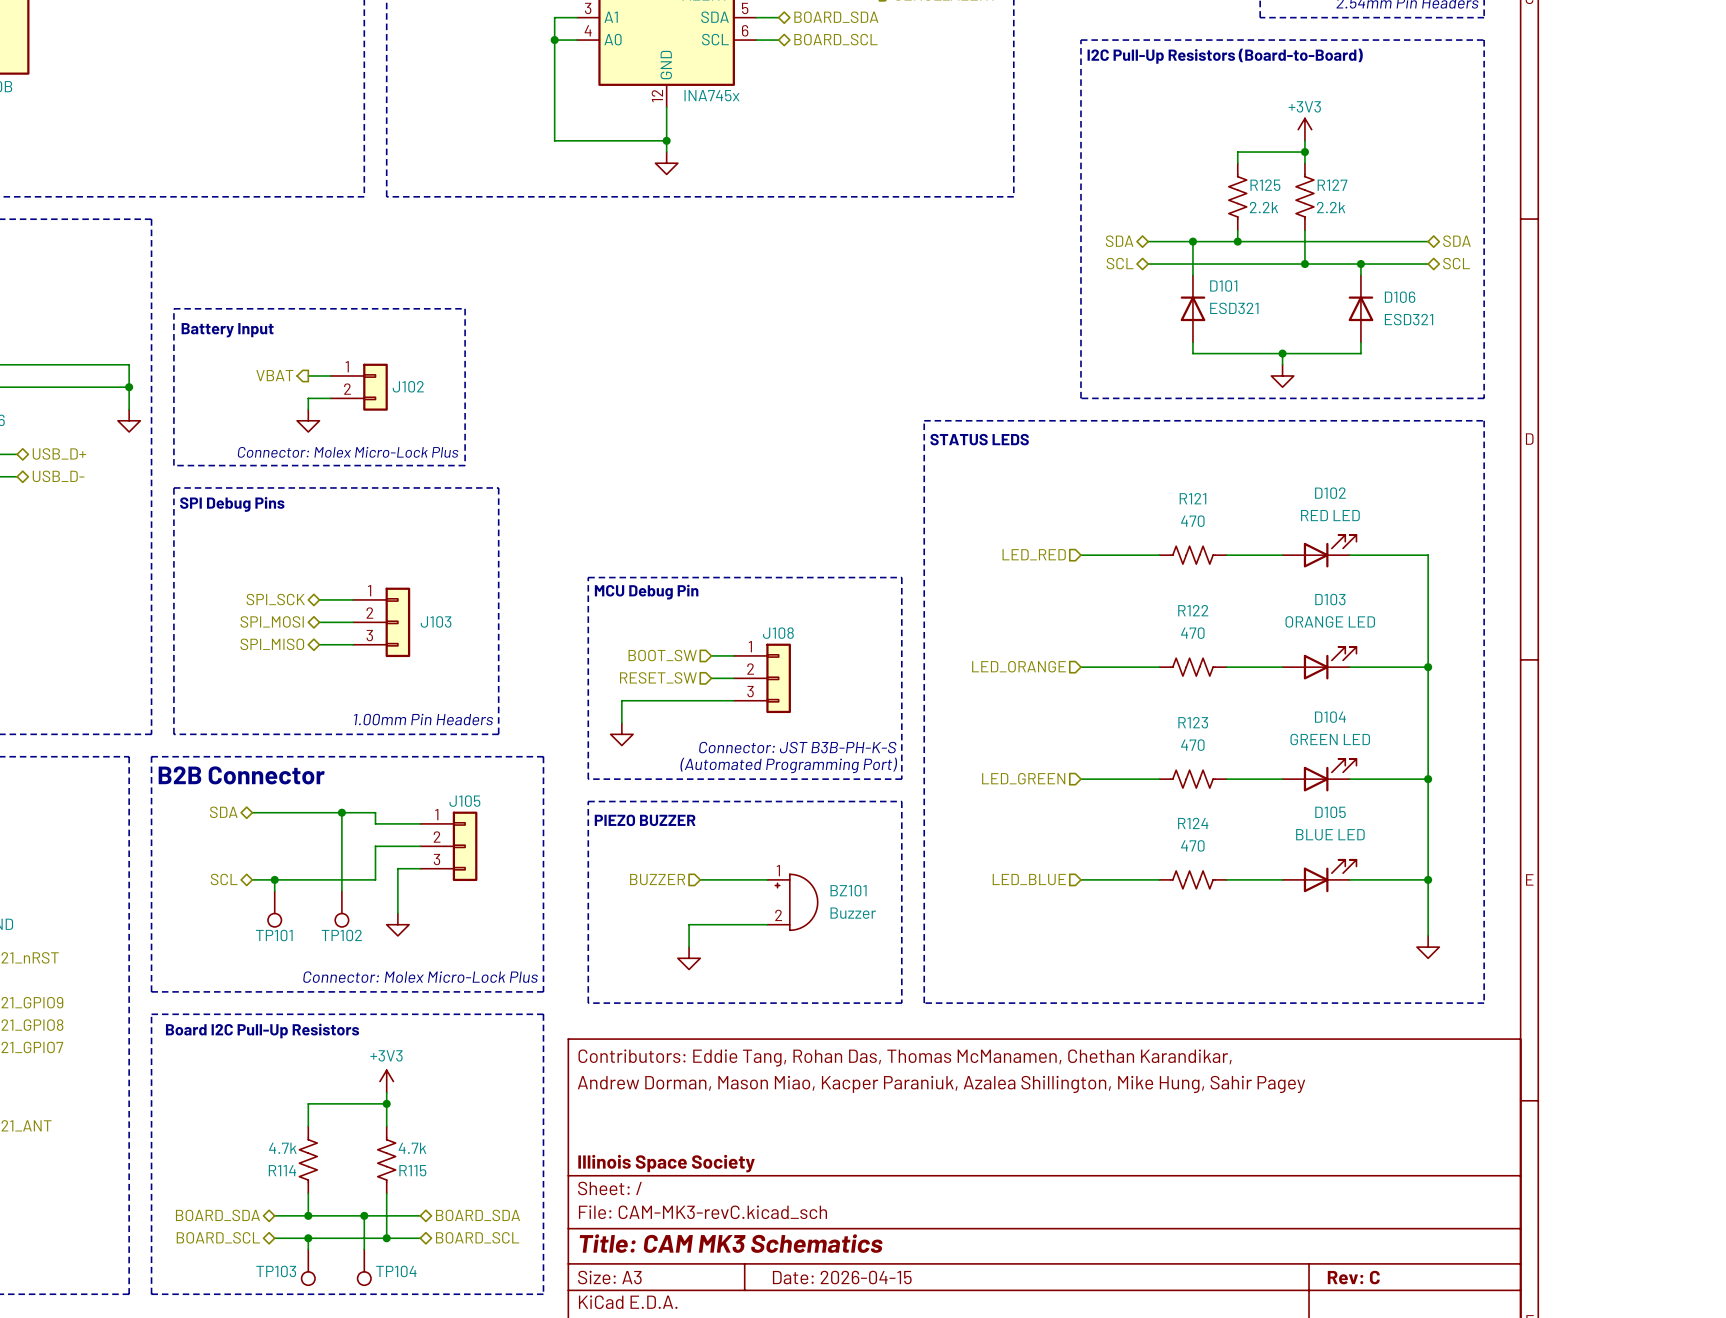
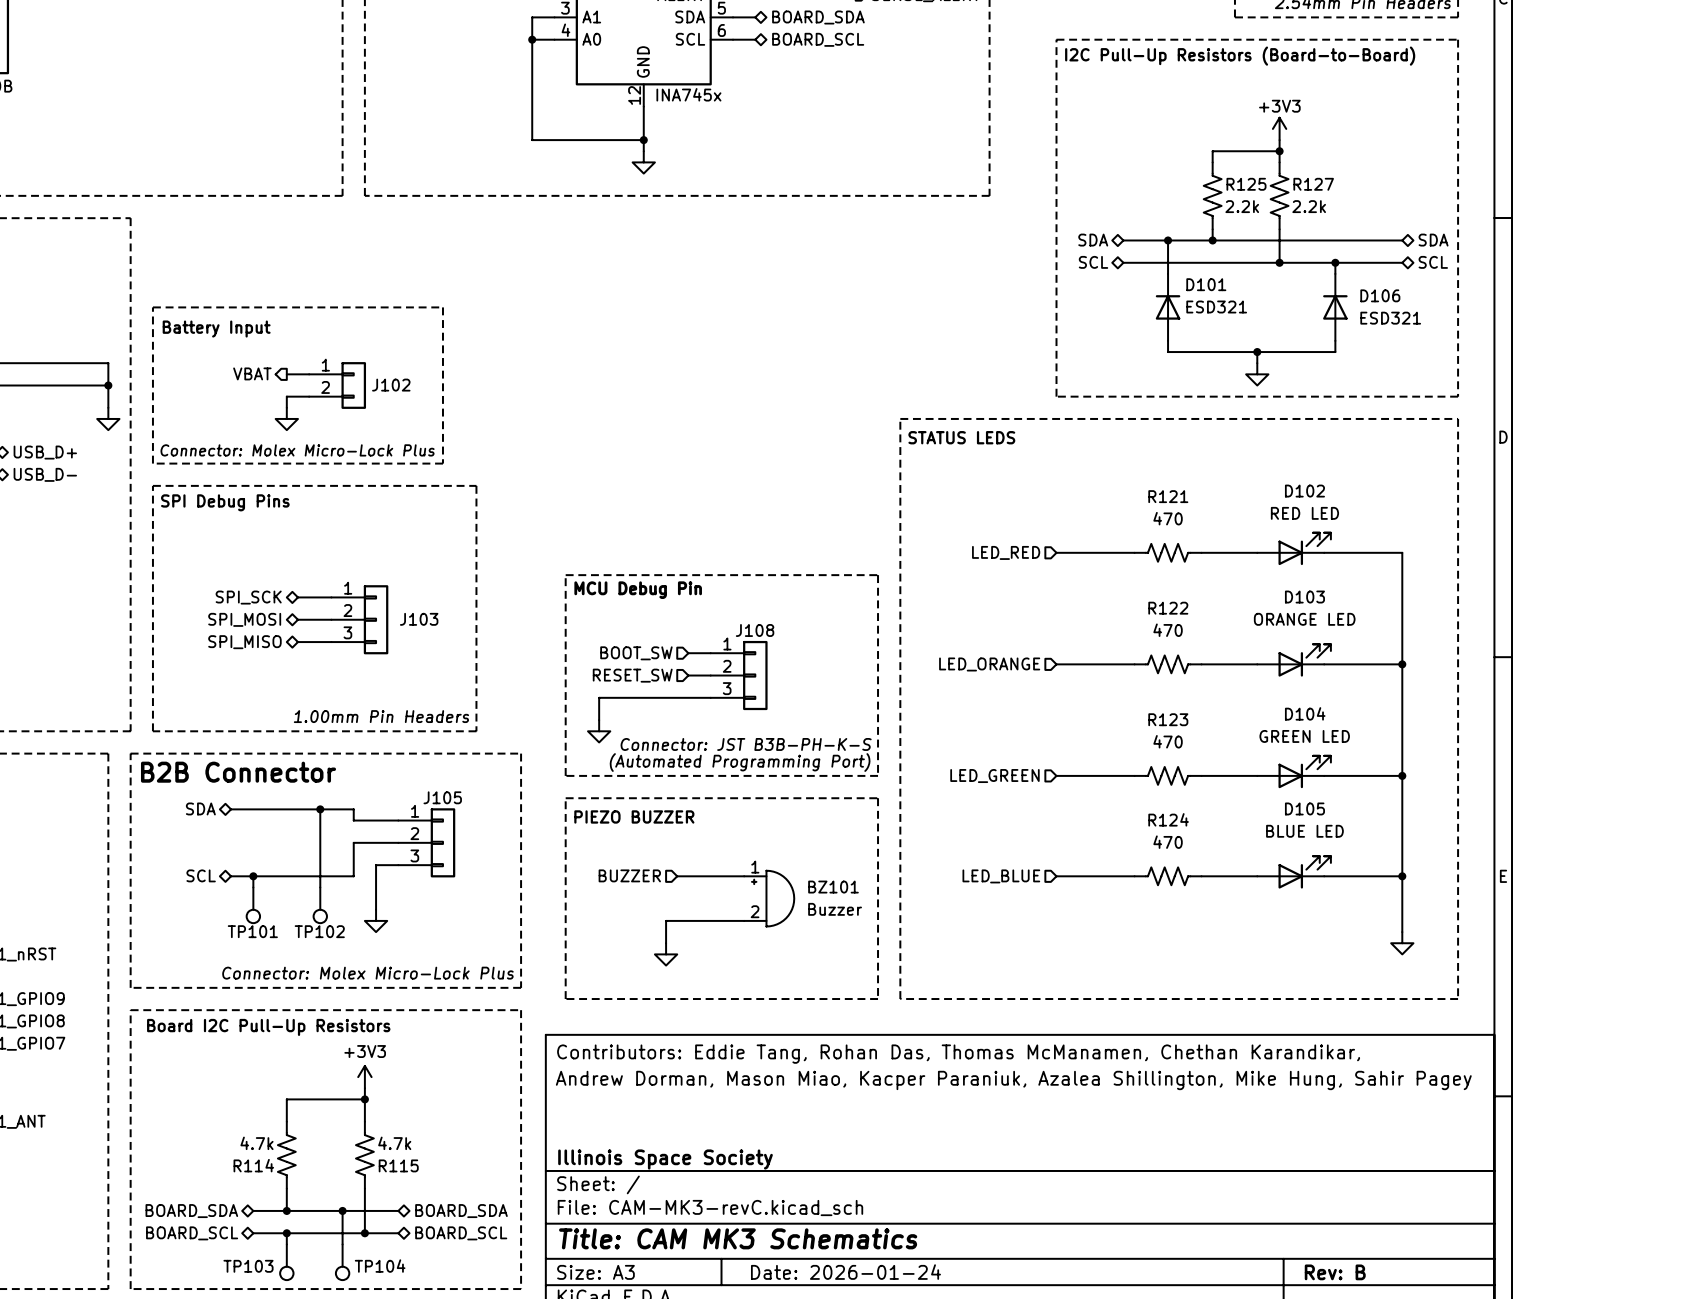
title block: Date: 2026-04-15 (842, 1277) -> Date: 2026-01-24 (845, 1272)
title block: Rev: C (1353, 1277) -> Rev: B (1335, 1272)

